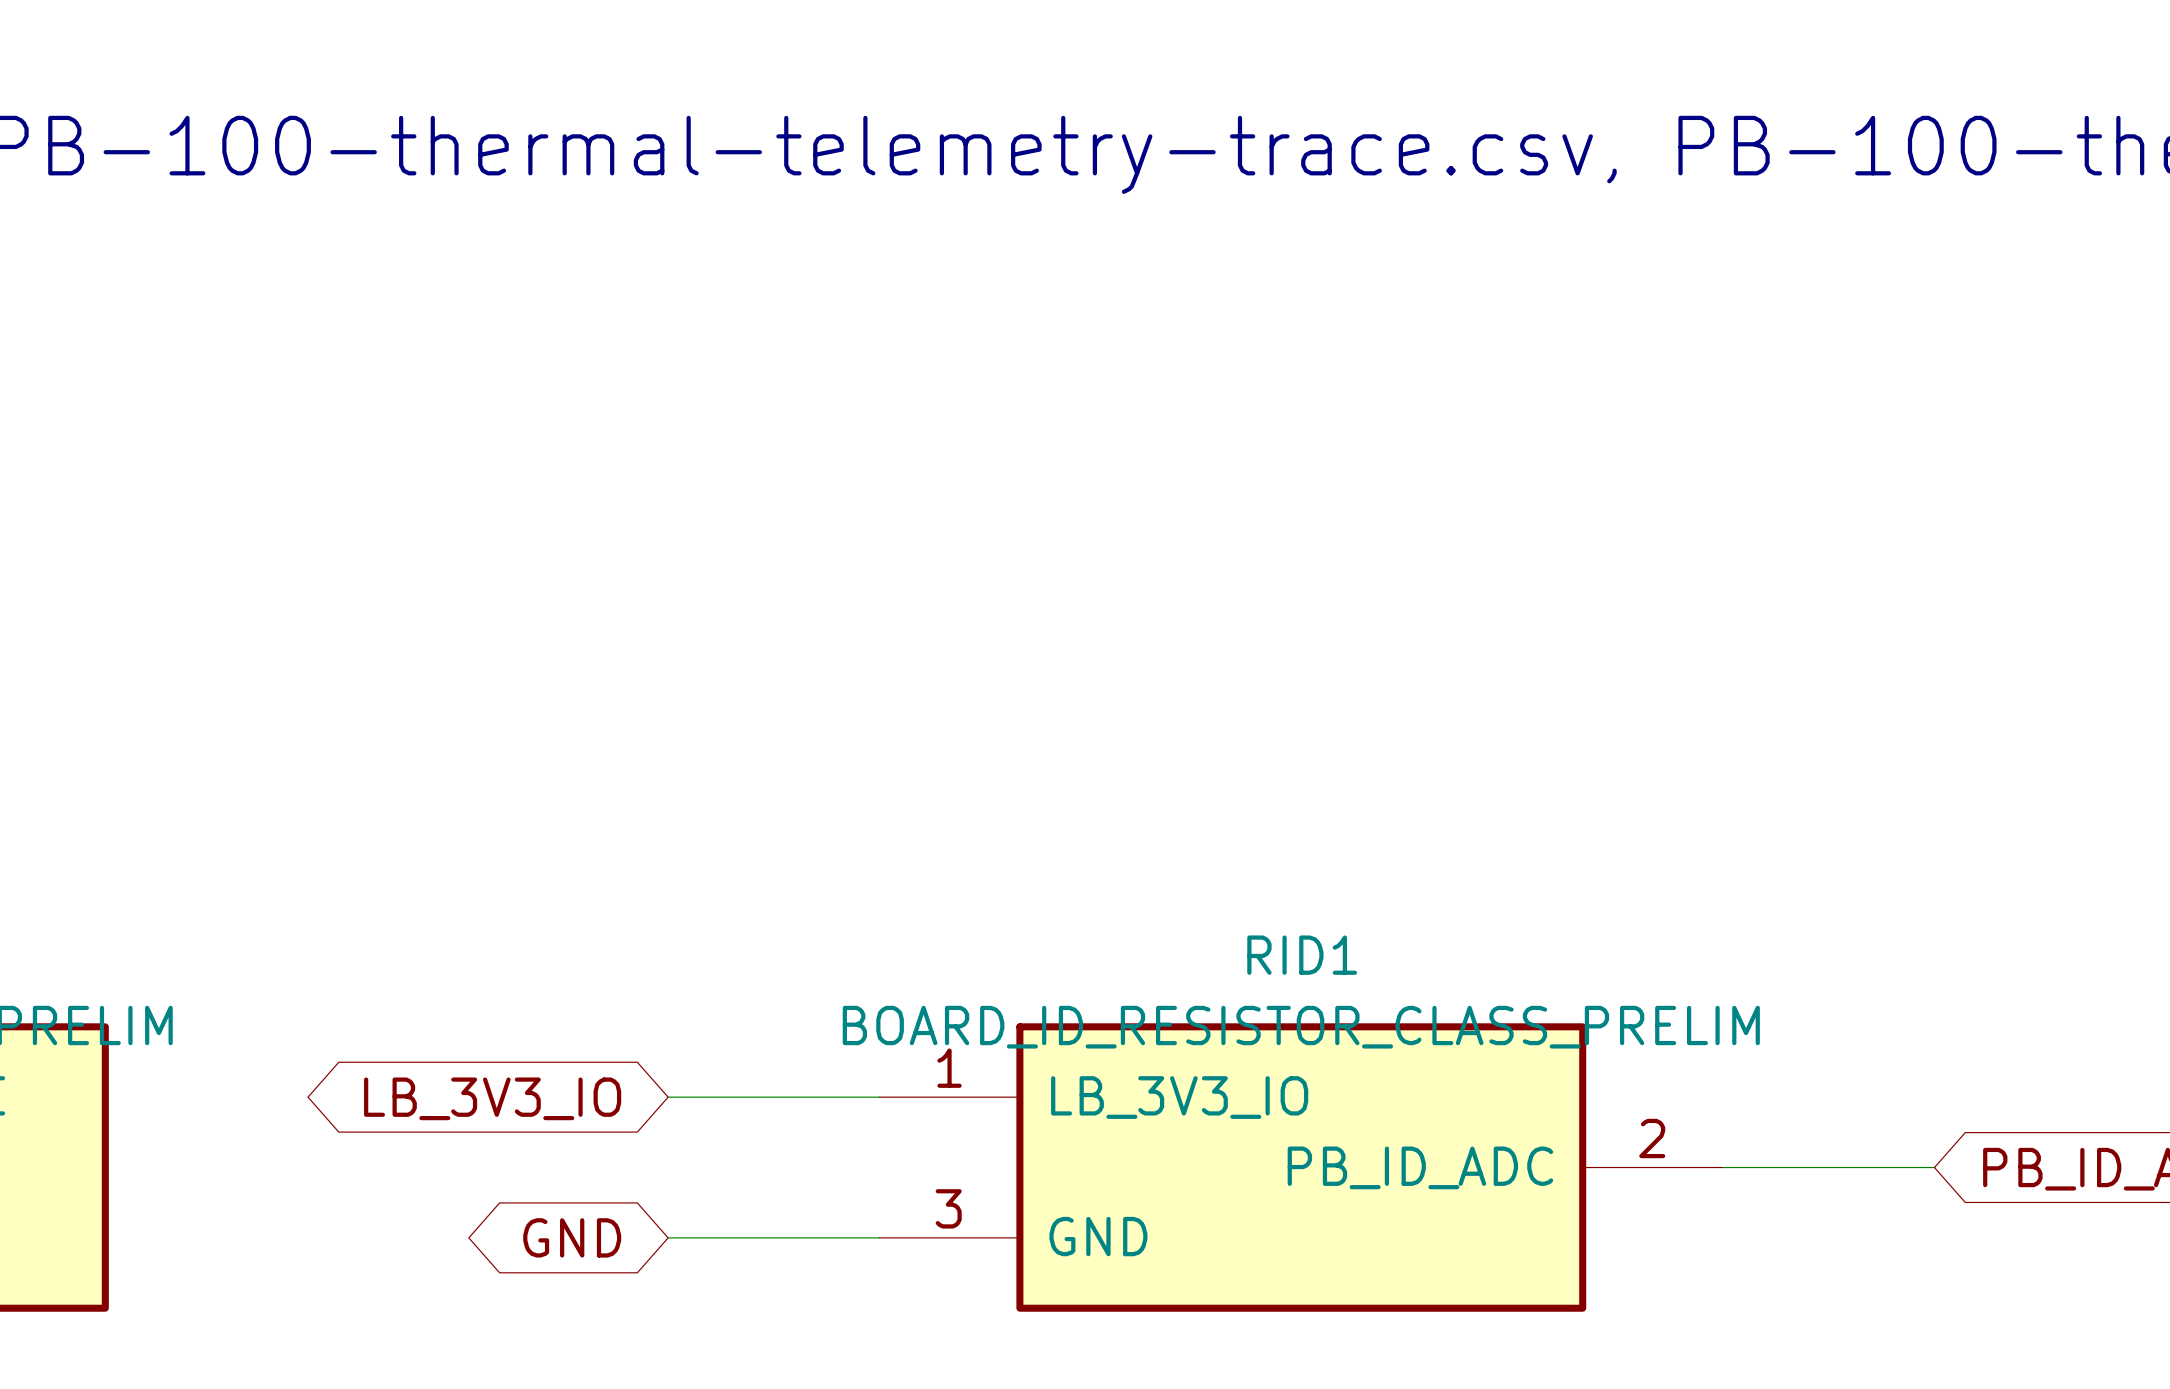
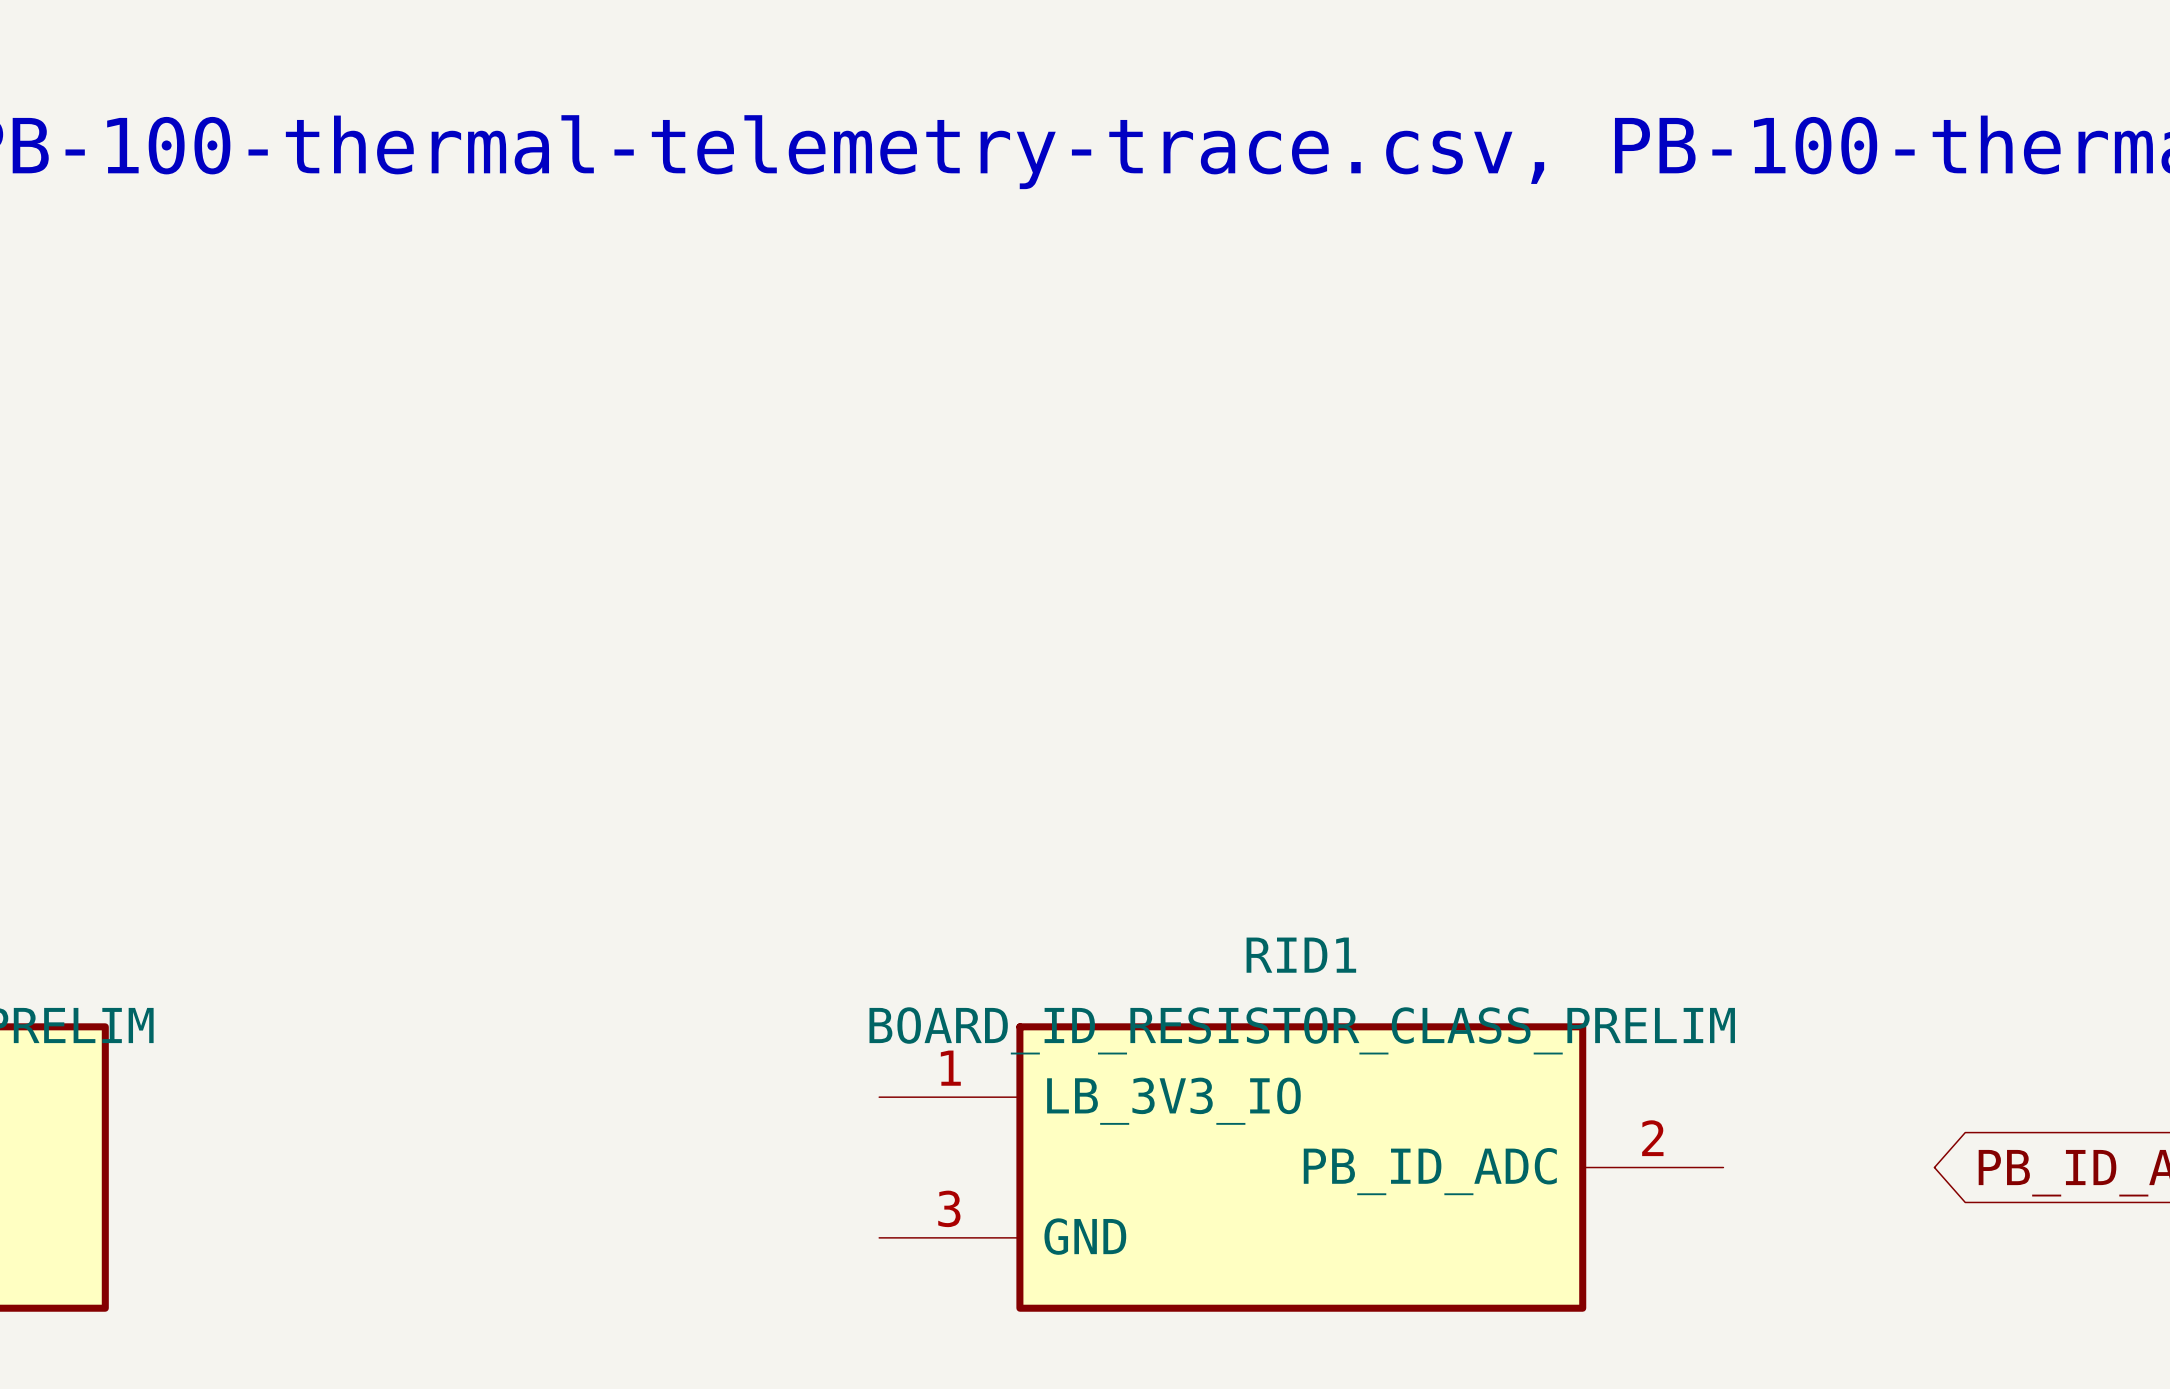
wire: (668, 1097) (879, 1097) -> none
global label: LB_3V3_IO (492, 1098) -> none
wire: (1723, 1167) (1934, 1167) -> none
global label: GND (572, 1237) -> none
wire: (668, 1237) (879, 1237) -> none

